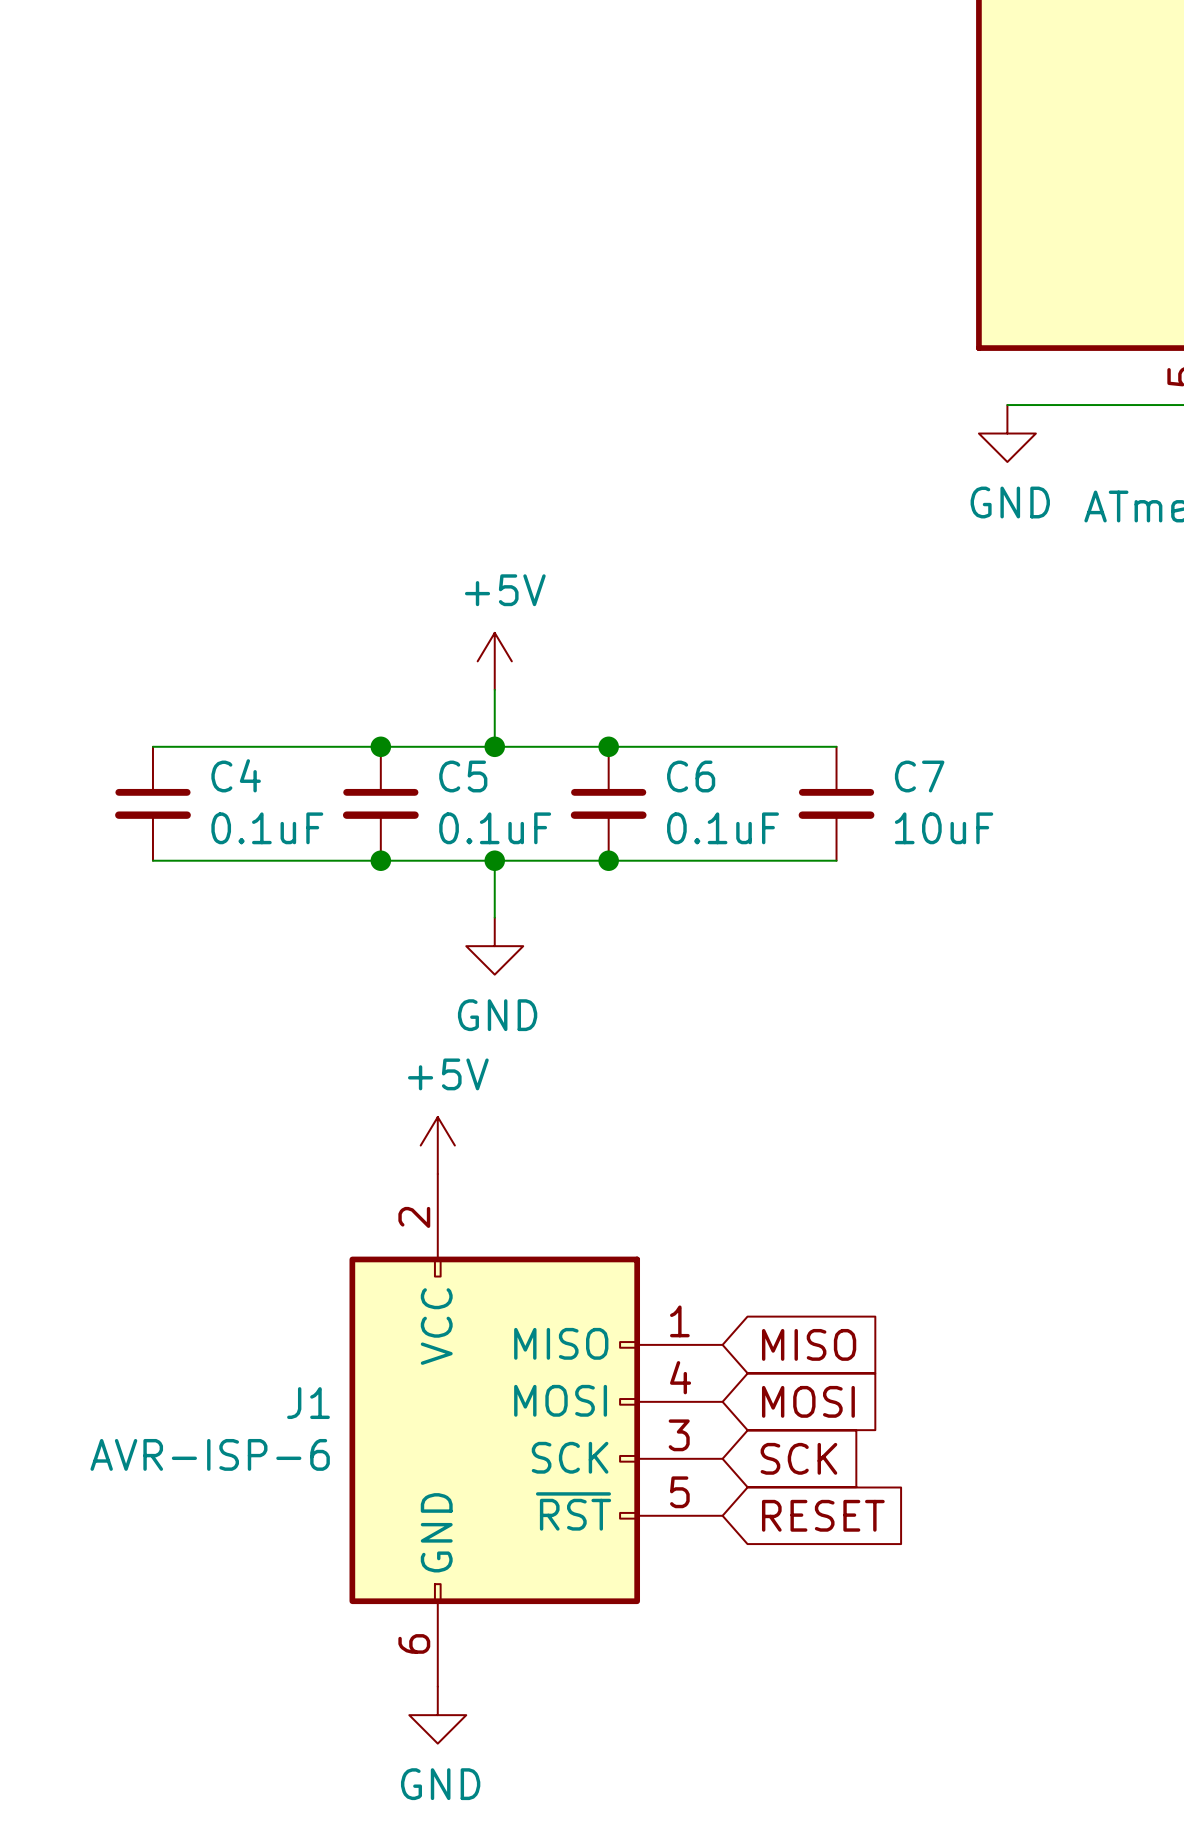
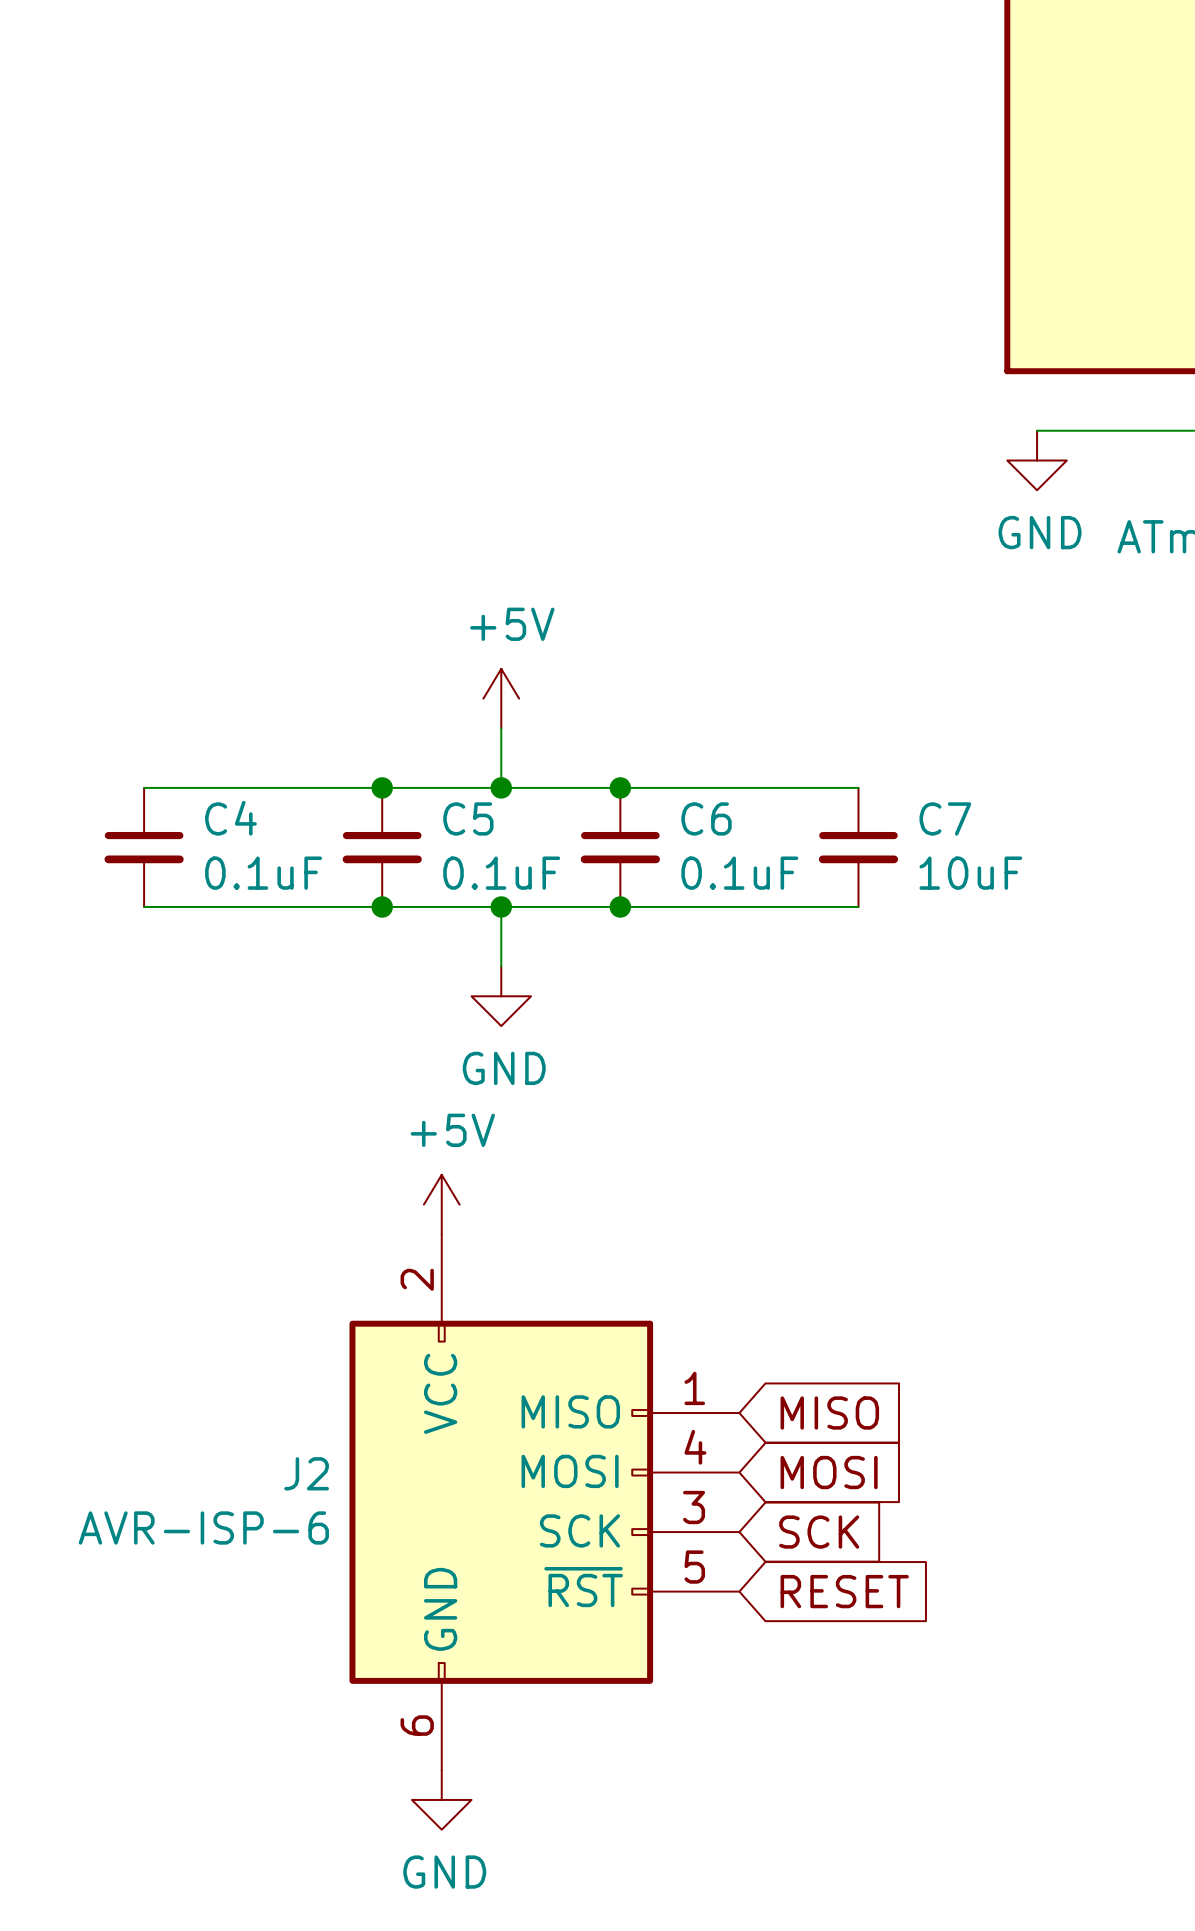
J1 name: J1 (308, 1403) -> J2 (306, 1473)

